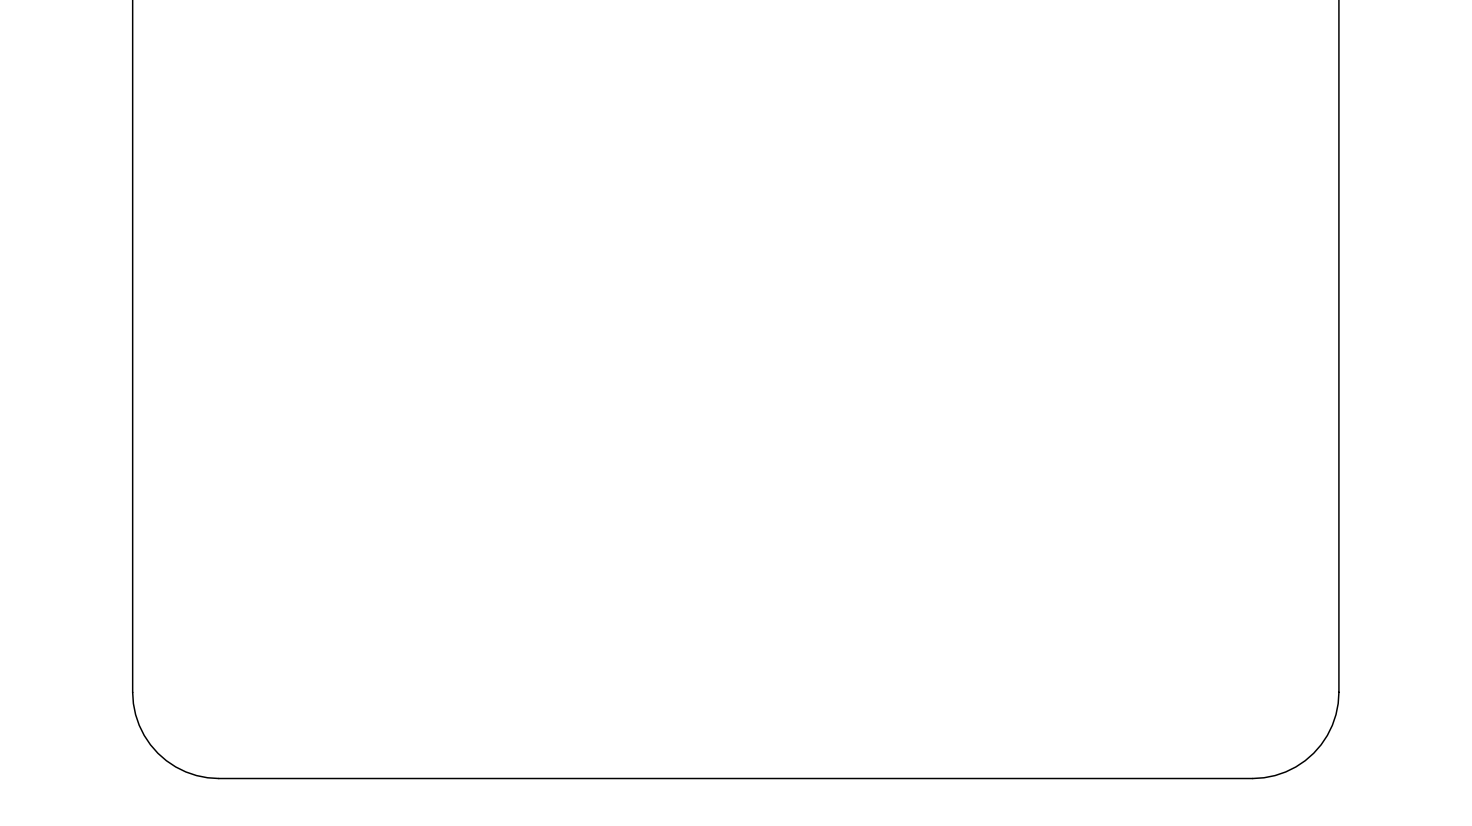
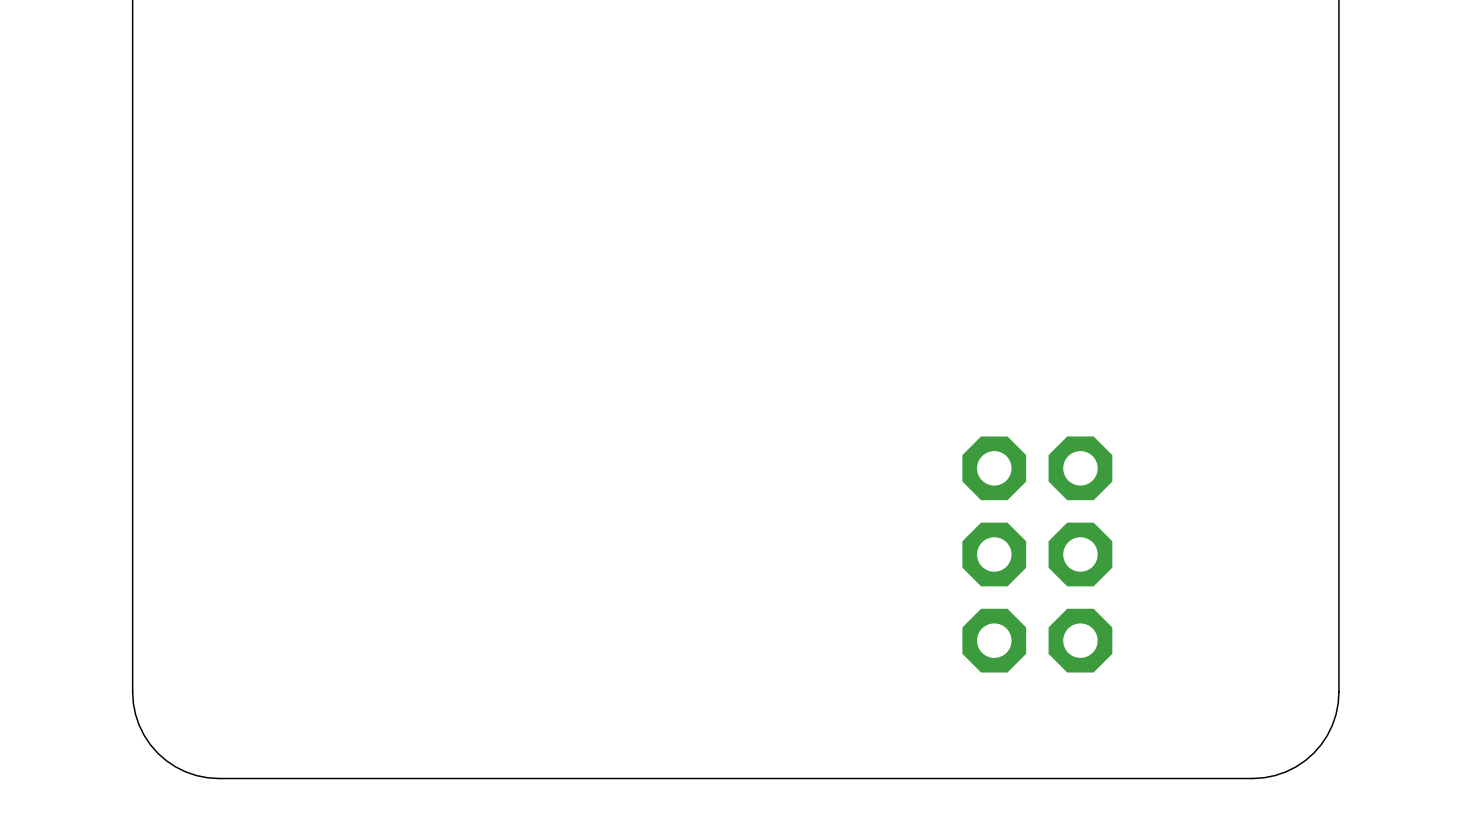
part: none -> (1037, 554)

